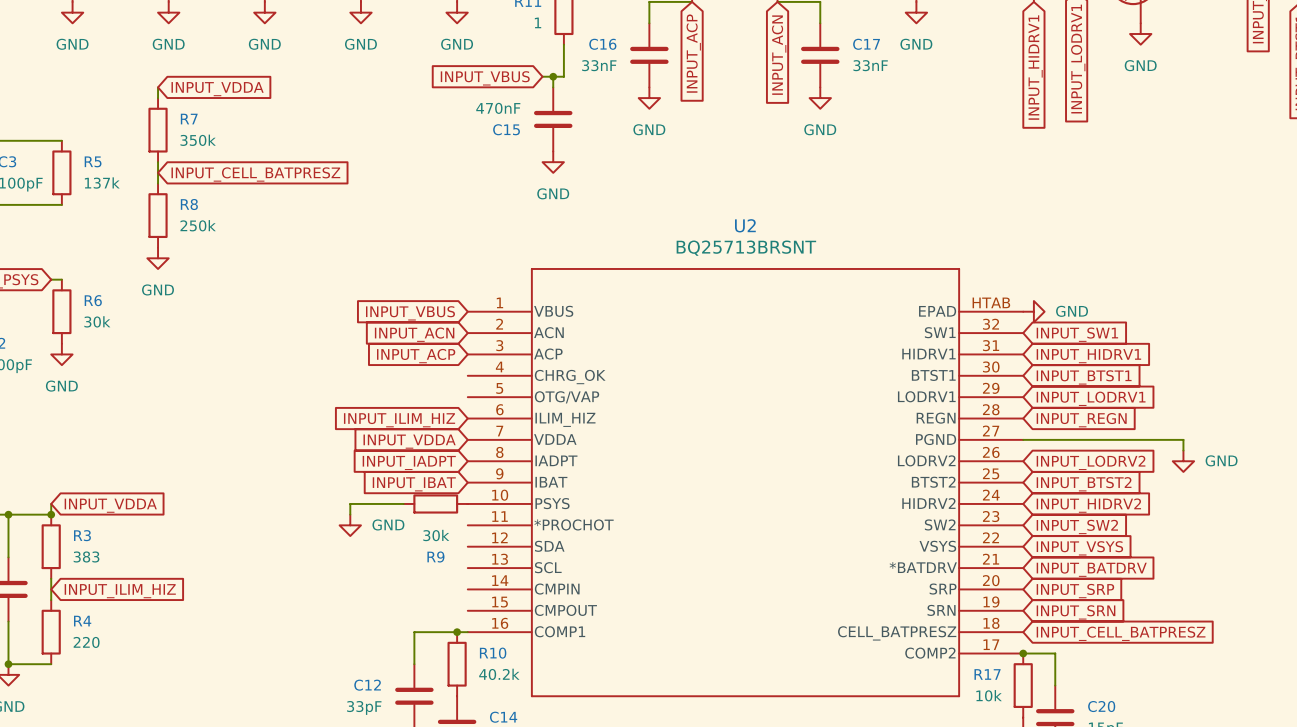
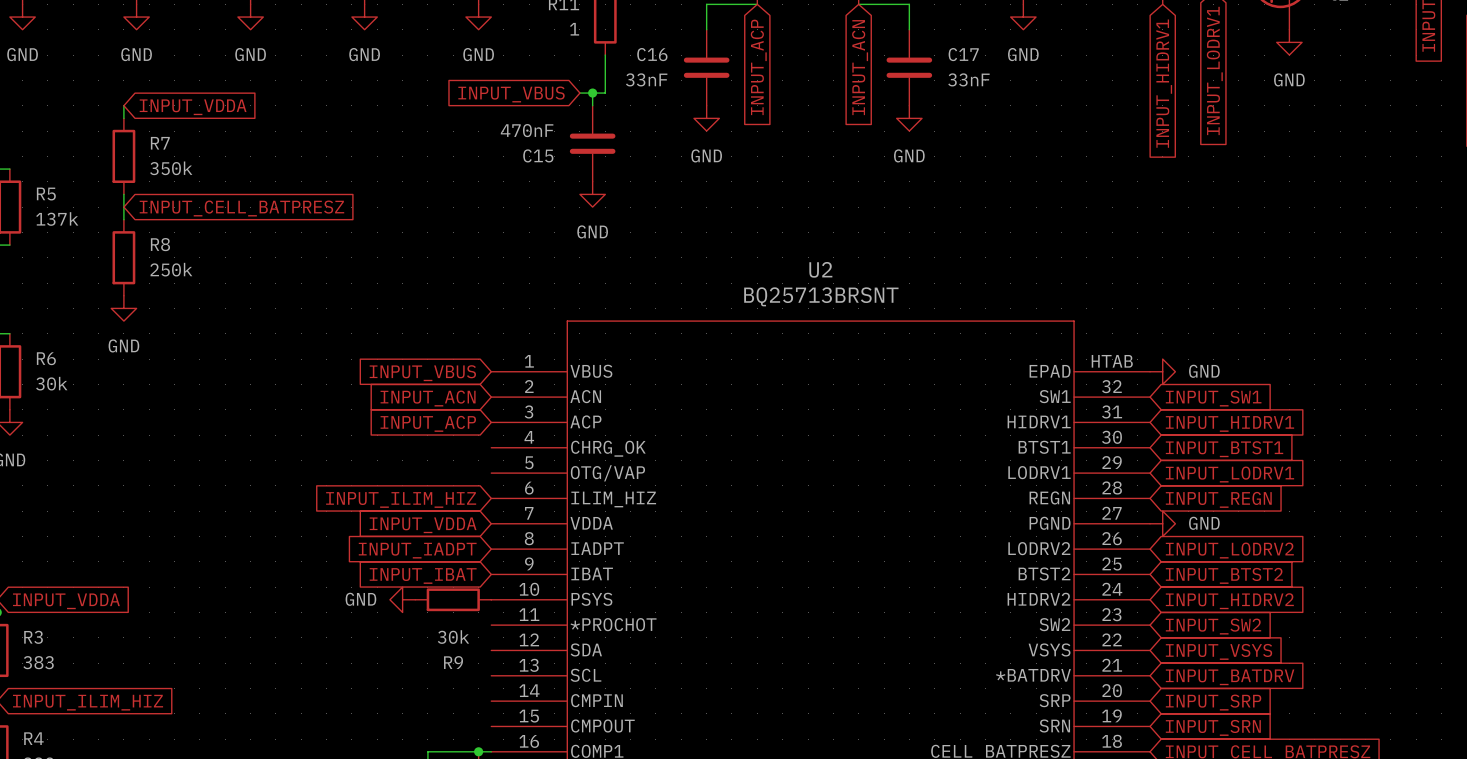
wire: (1023, 439) (1183, 439) (1183, 450) -> none
power symbol rotation: 0° (1183, 461) -> 90° counterclockwise (1162, 523)
power symbol position: GND (1183, 461) -> GND (1162, 523)
wire: (403, 503) (350, 503) (350, 514) -> none
power symbol text position: GND (388, 524) -> GND (360, 599)
power symbol rotation: 0° (350, 525) -> 90° clockwise (402, 599)
power symbol position: GND (350, 525) -> GND (402, 599)

